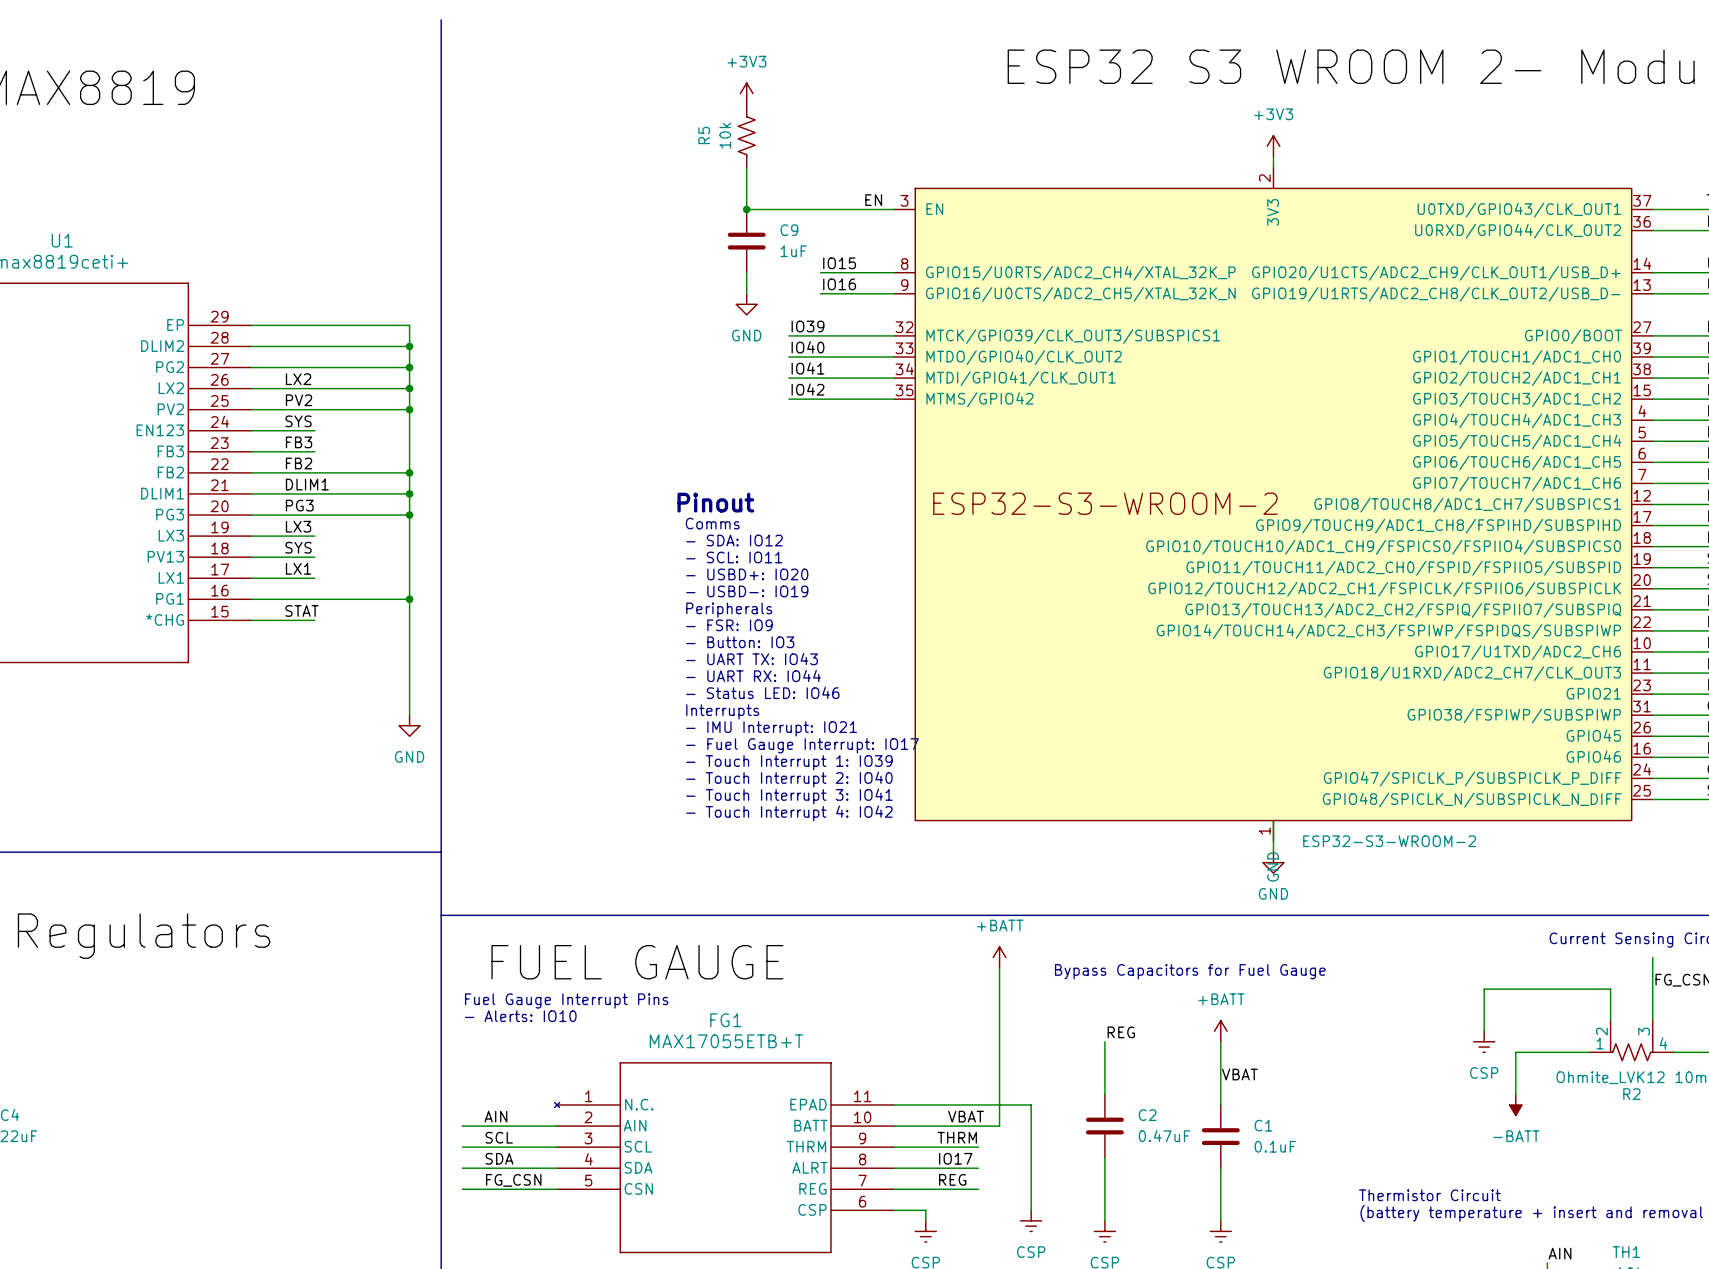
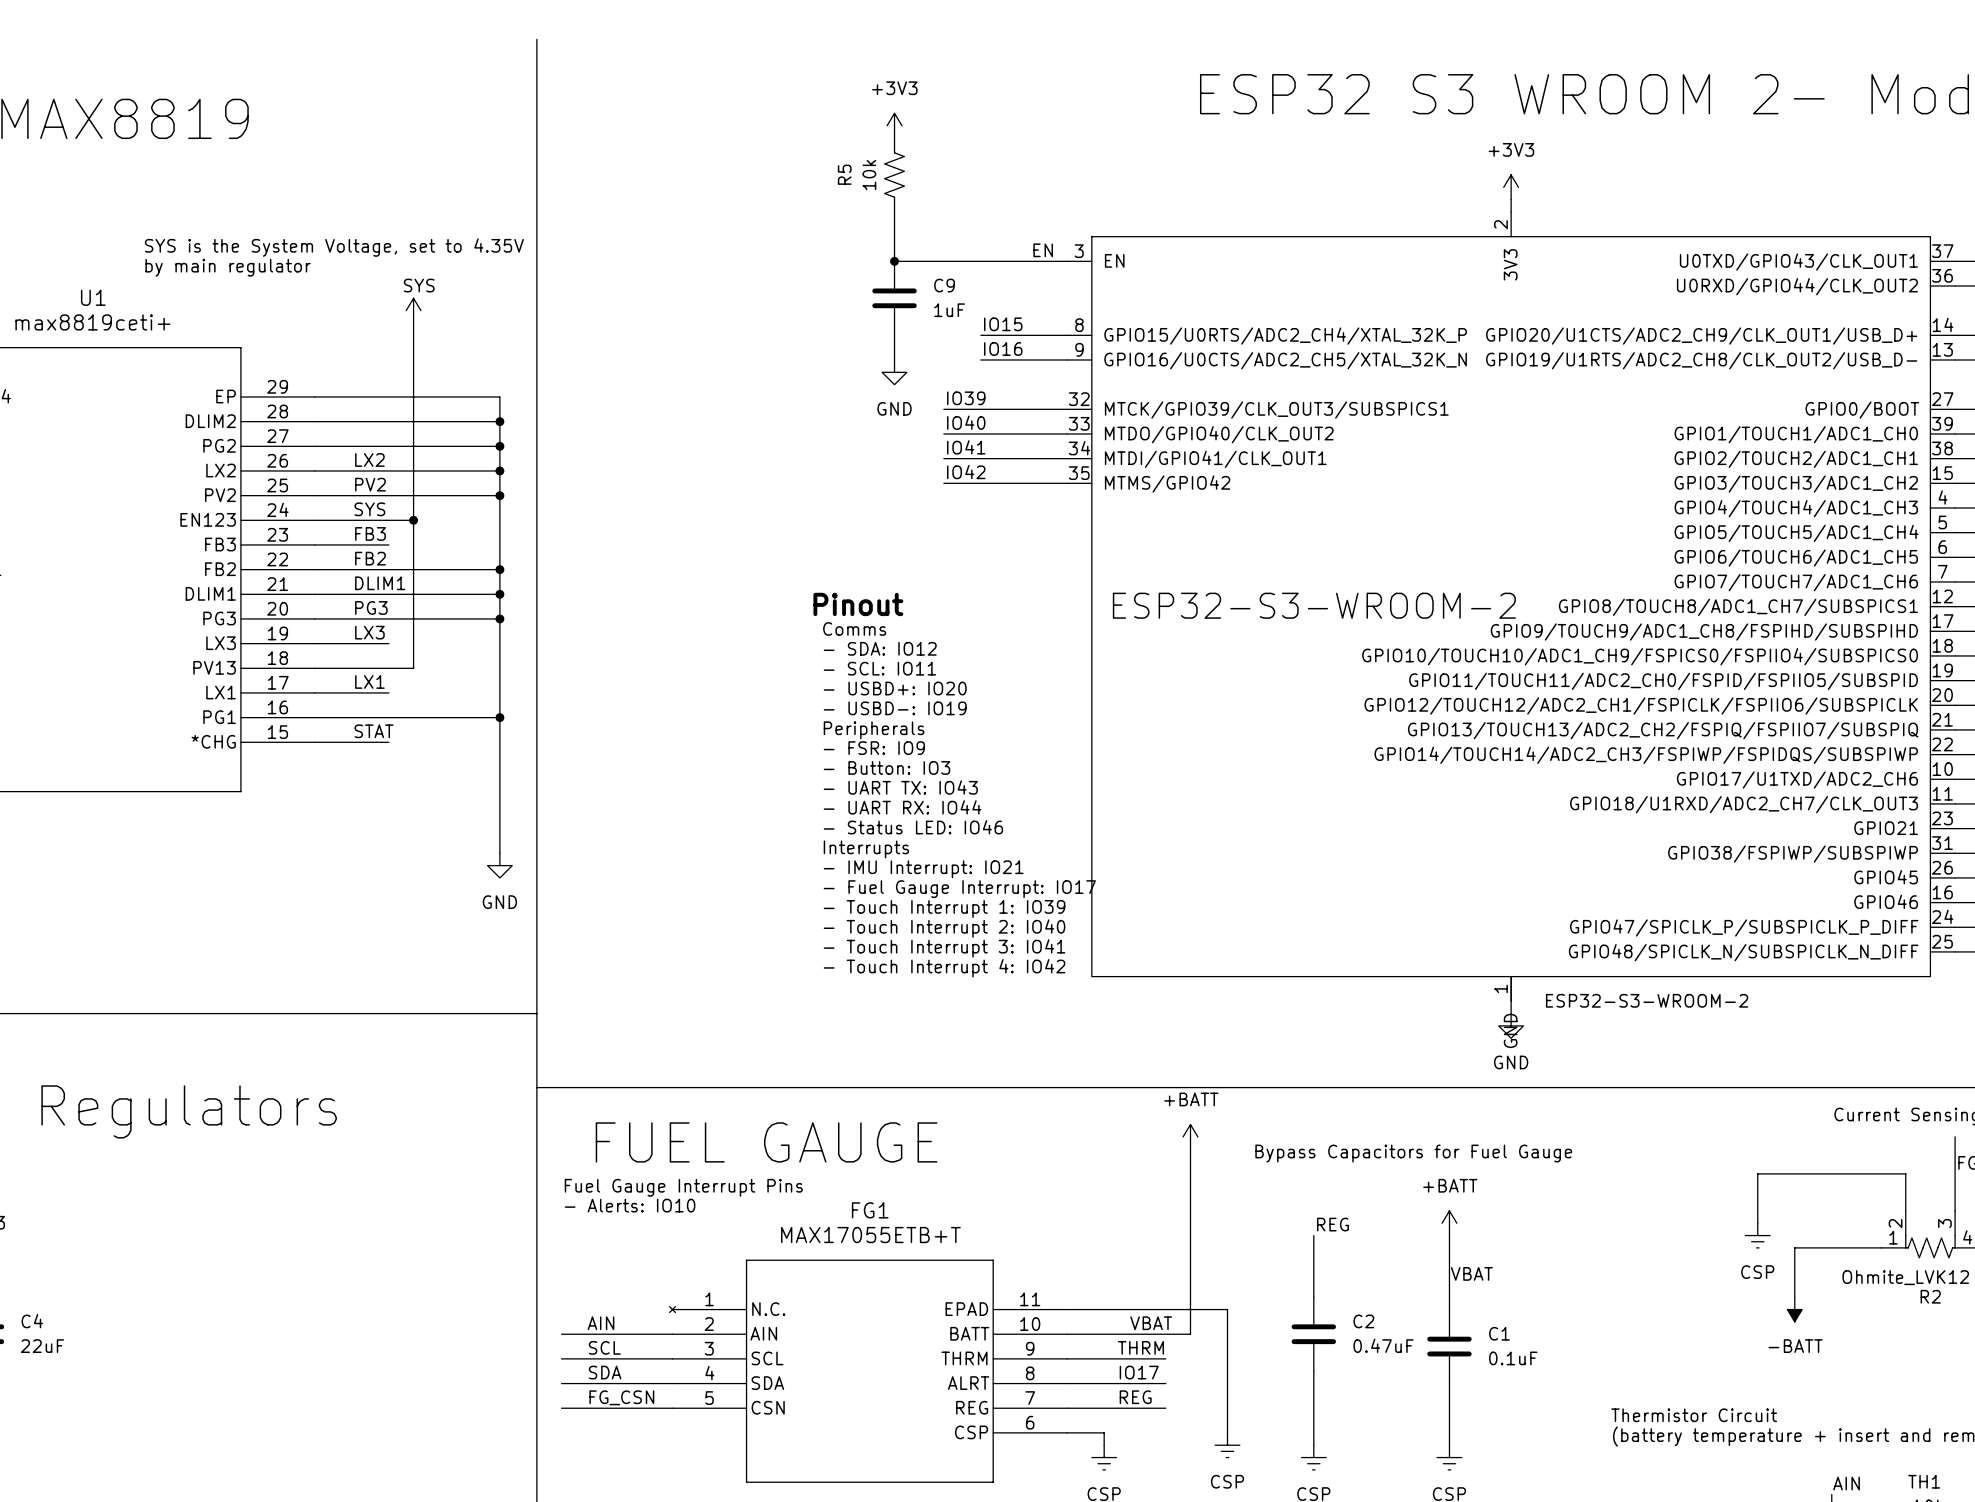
text: none -> SYS is the System Voltage, set to 4.35V (334, 247)
text: none -> by main regulator (228, 267)
part: none -> SYS (413, 310)
wire: none -> (413, 323) (413, 668) (388, 668)
wire: none -> (388, 520) (413, 520)
junction: none -> (413, 520)
label: SYS (298, 547) -> none

